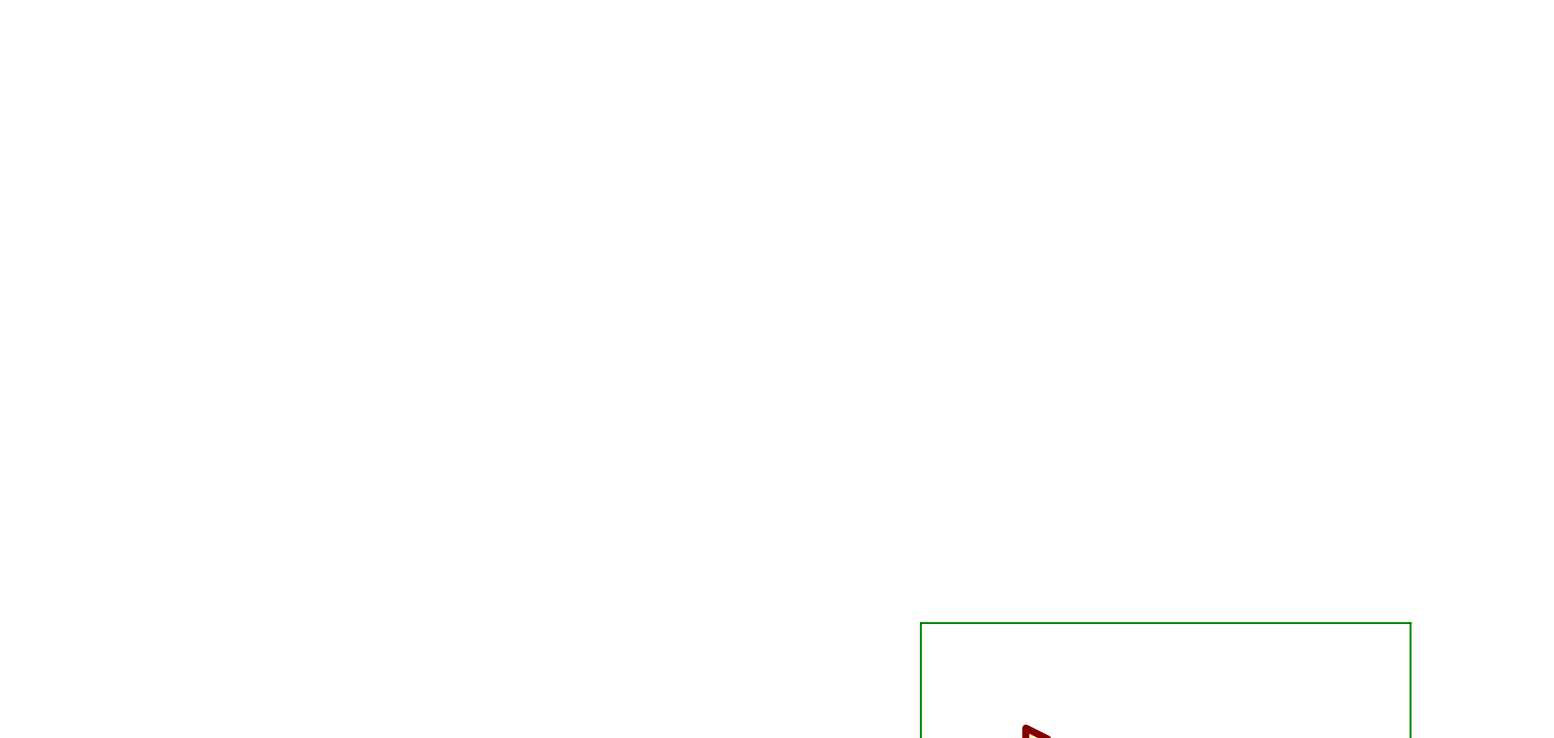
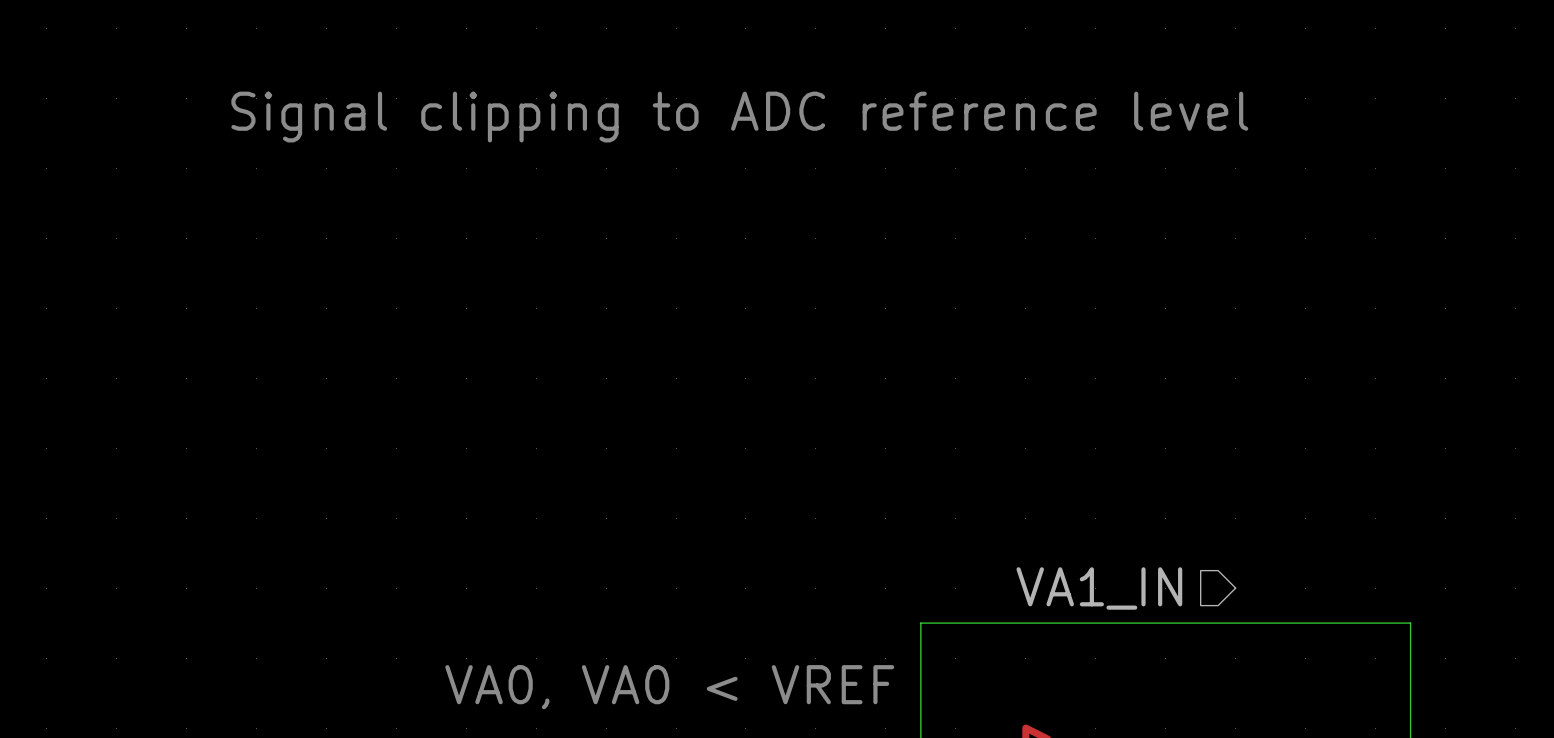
text: none -> Signal clipping to ADC reference level (739, 117)
hierarchical label: none -> VA1_IN (1099, 588)
text: none -> VA0, VA0 < VREF (669, 687)

